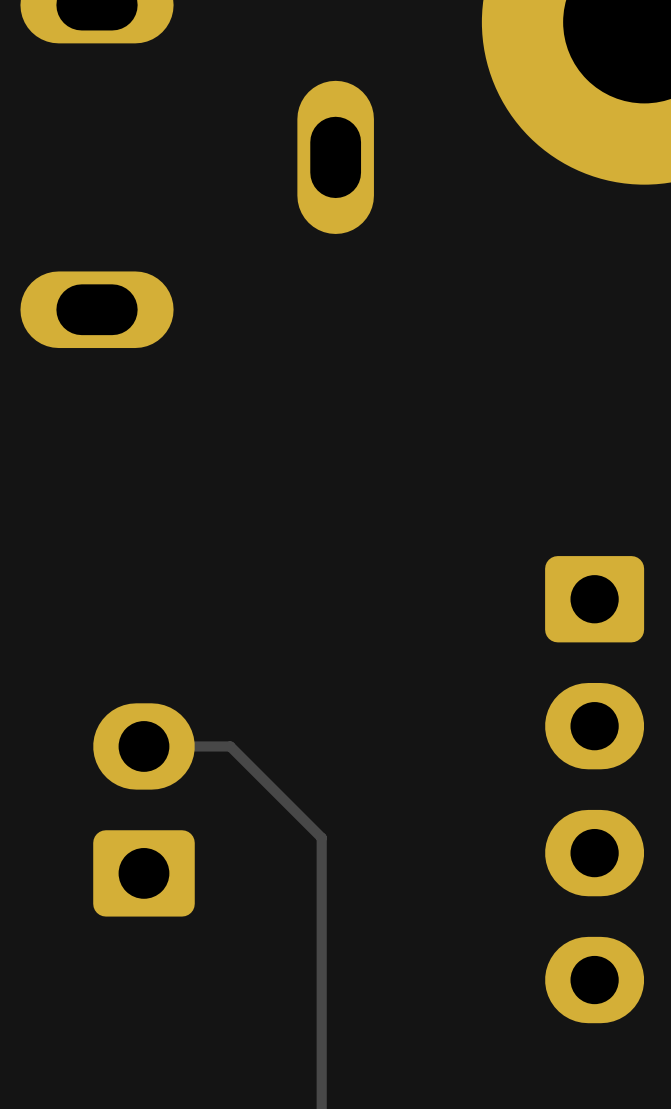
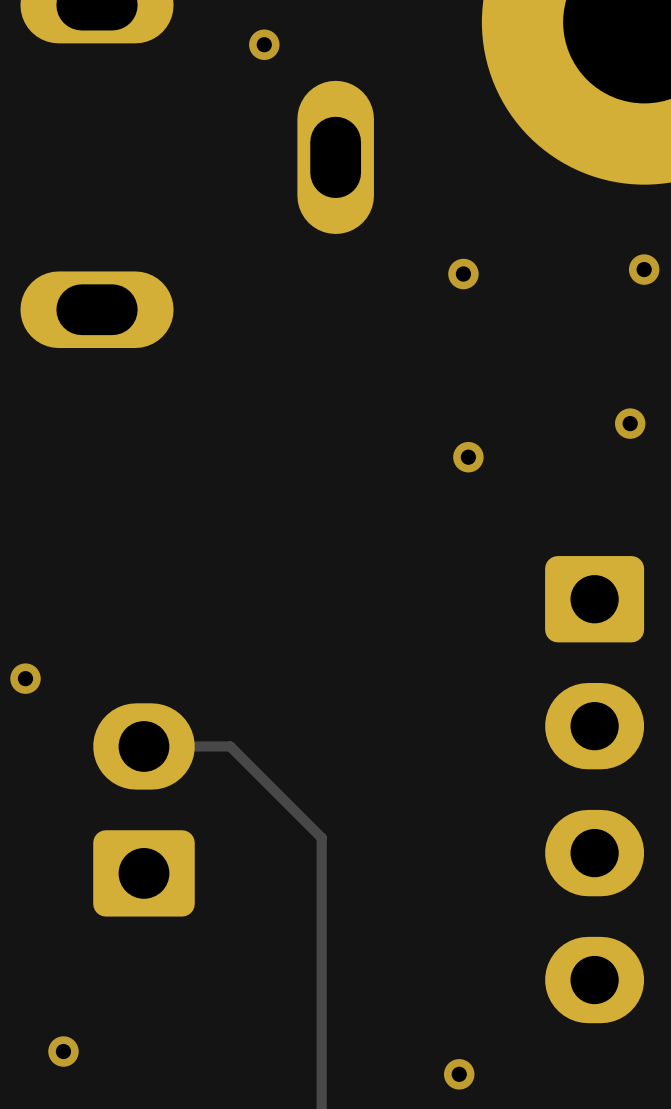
via: none -> (264, 44)
via: none -> (644, 269)
via: none -> (463, 274)
via: none -> (630, 423)
via: none -> (468, 457)
via: none -> (25, 678)
via: none -> (63, 1051)
via: none -> (459, 1074)

